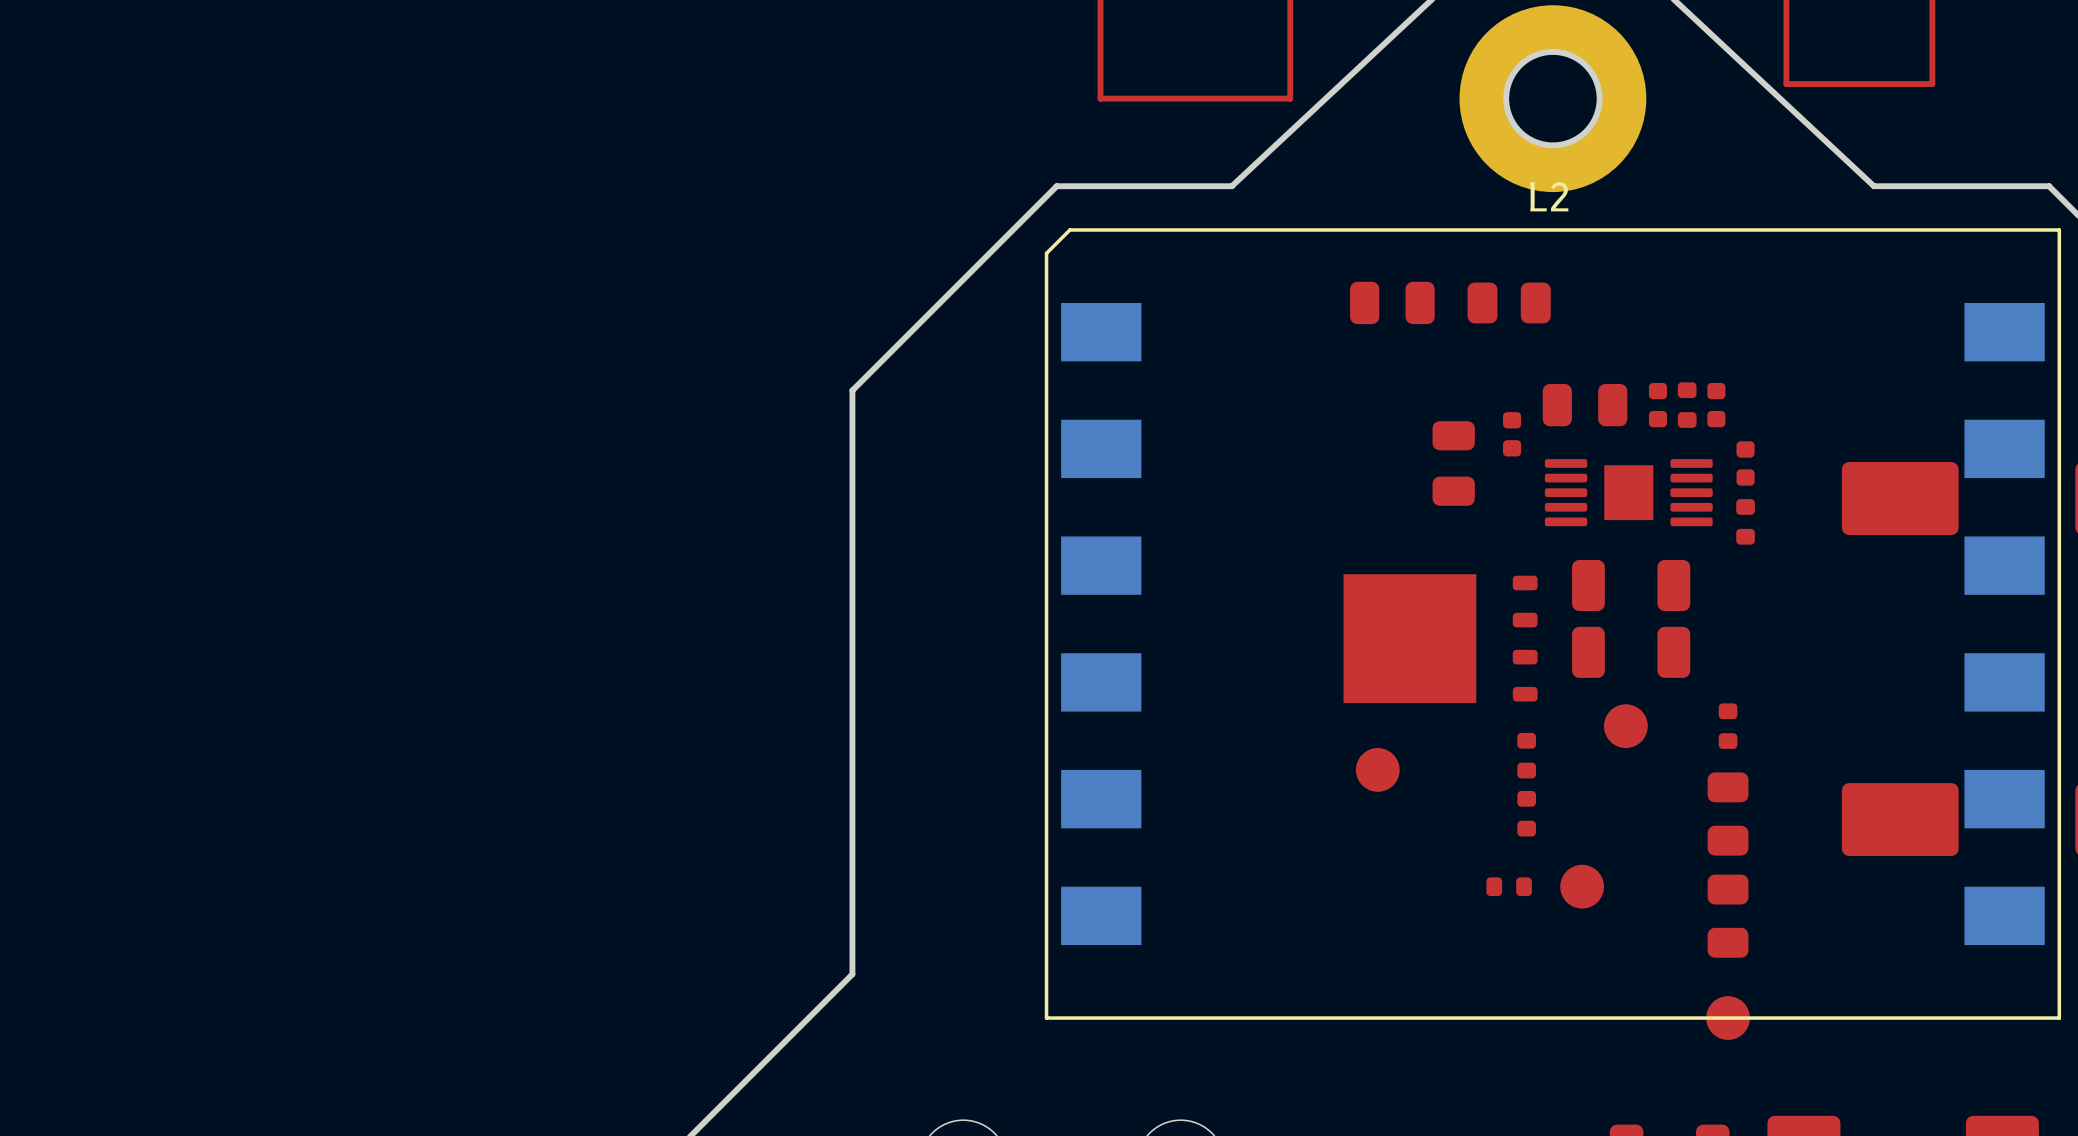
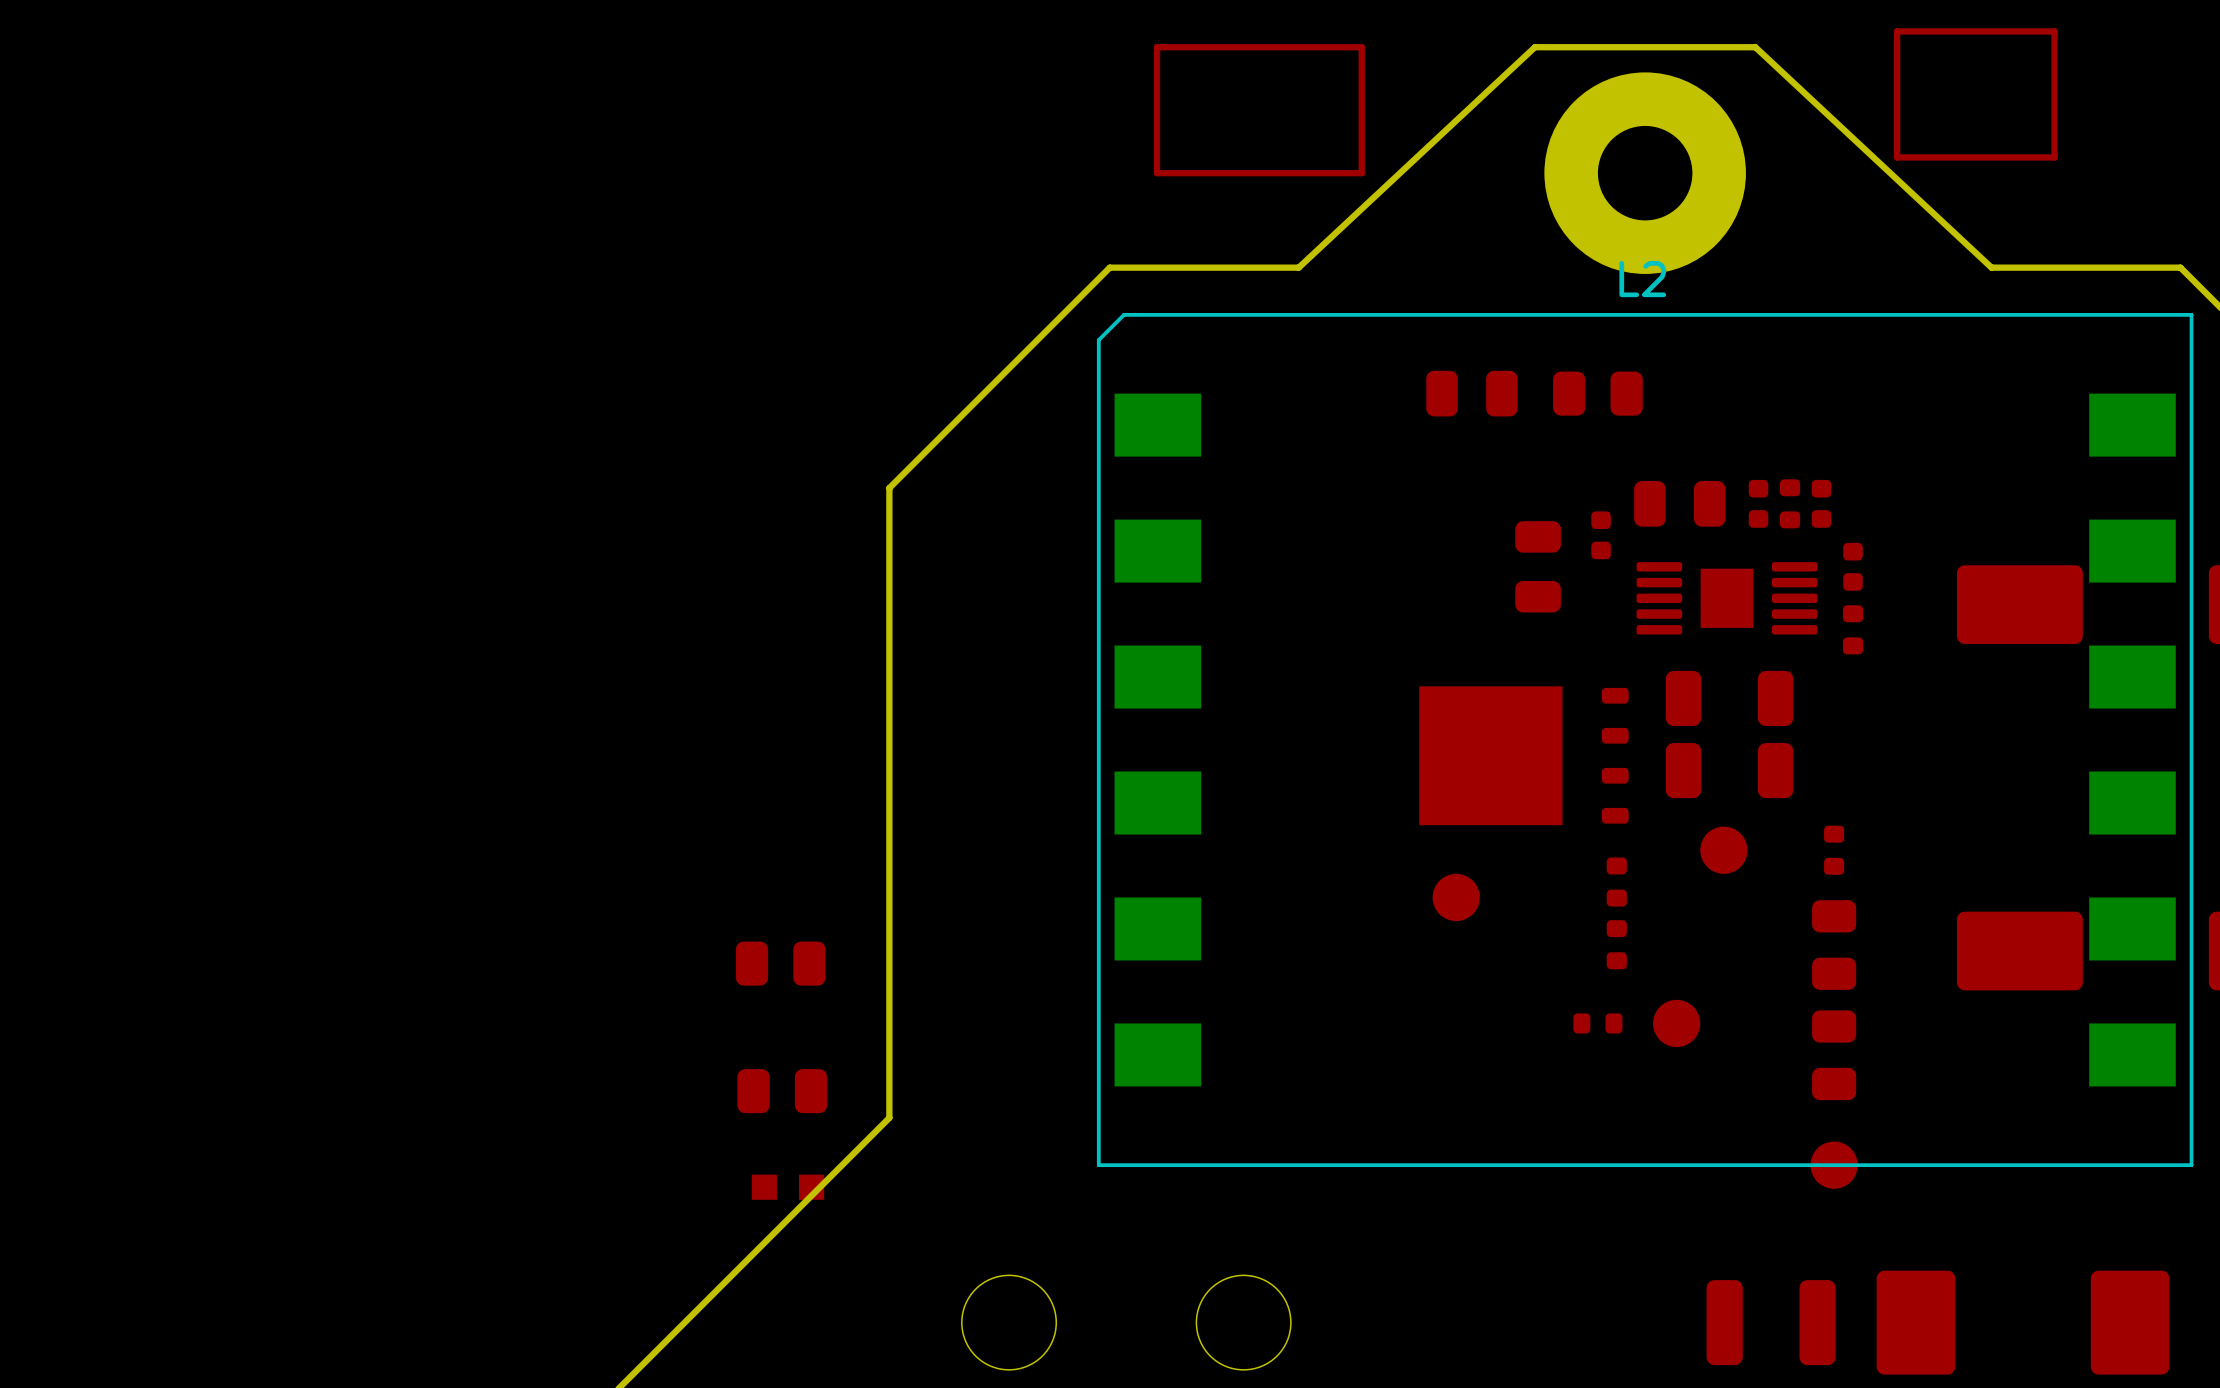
part: none -> (780, 963)
part: none -> (782, 1091)
part: none -> (787, 1187)

